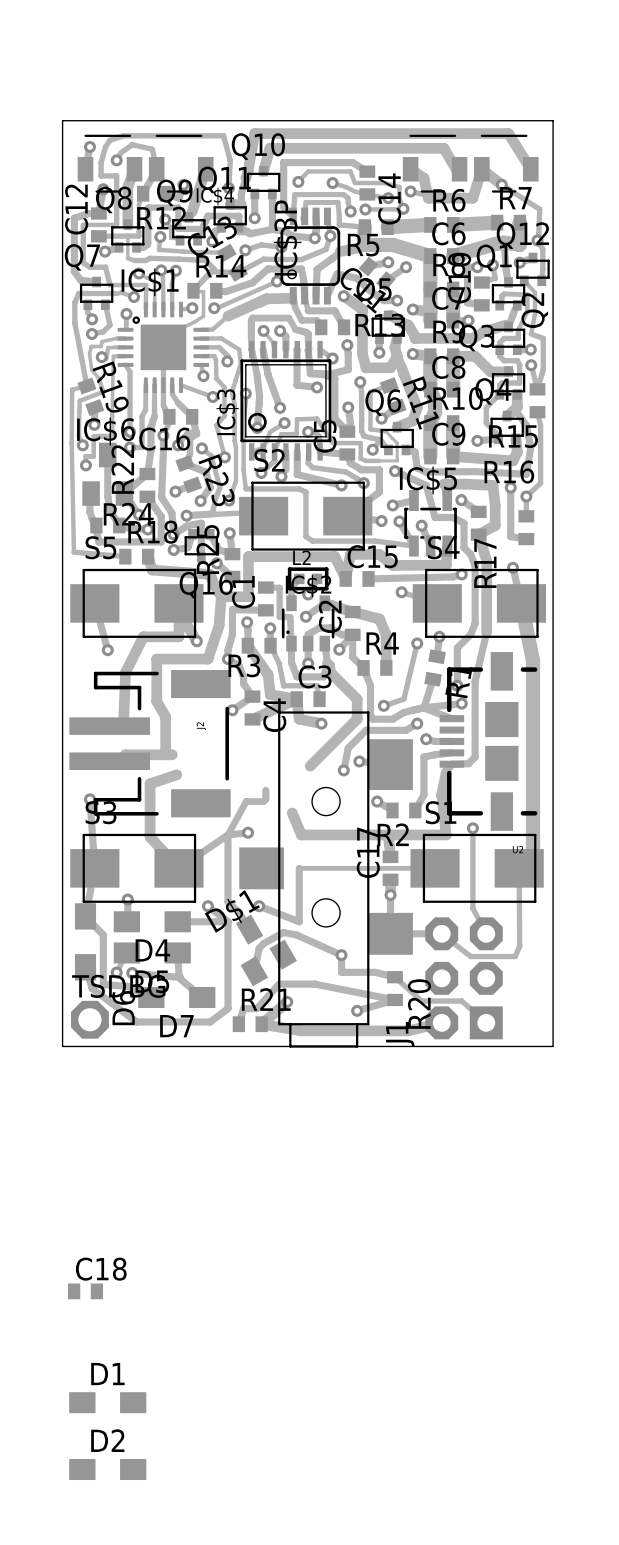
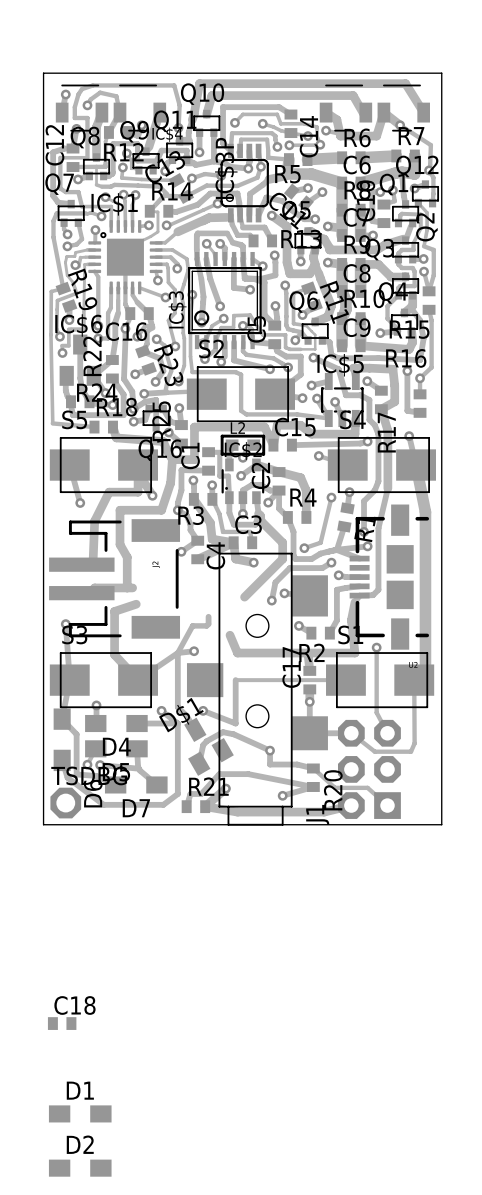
L2 footprint: [287, 567, 329, 591] -> [220, 434, 266, 456]

